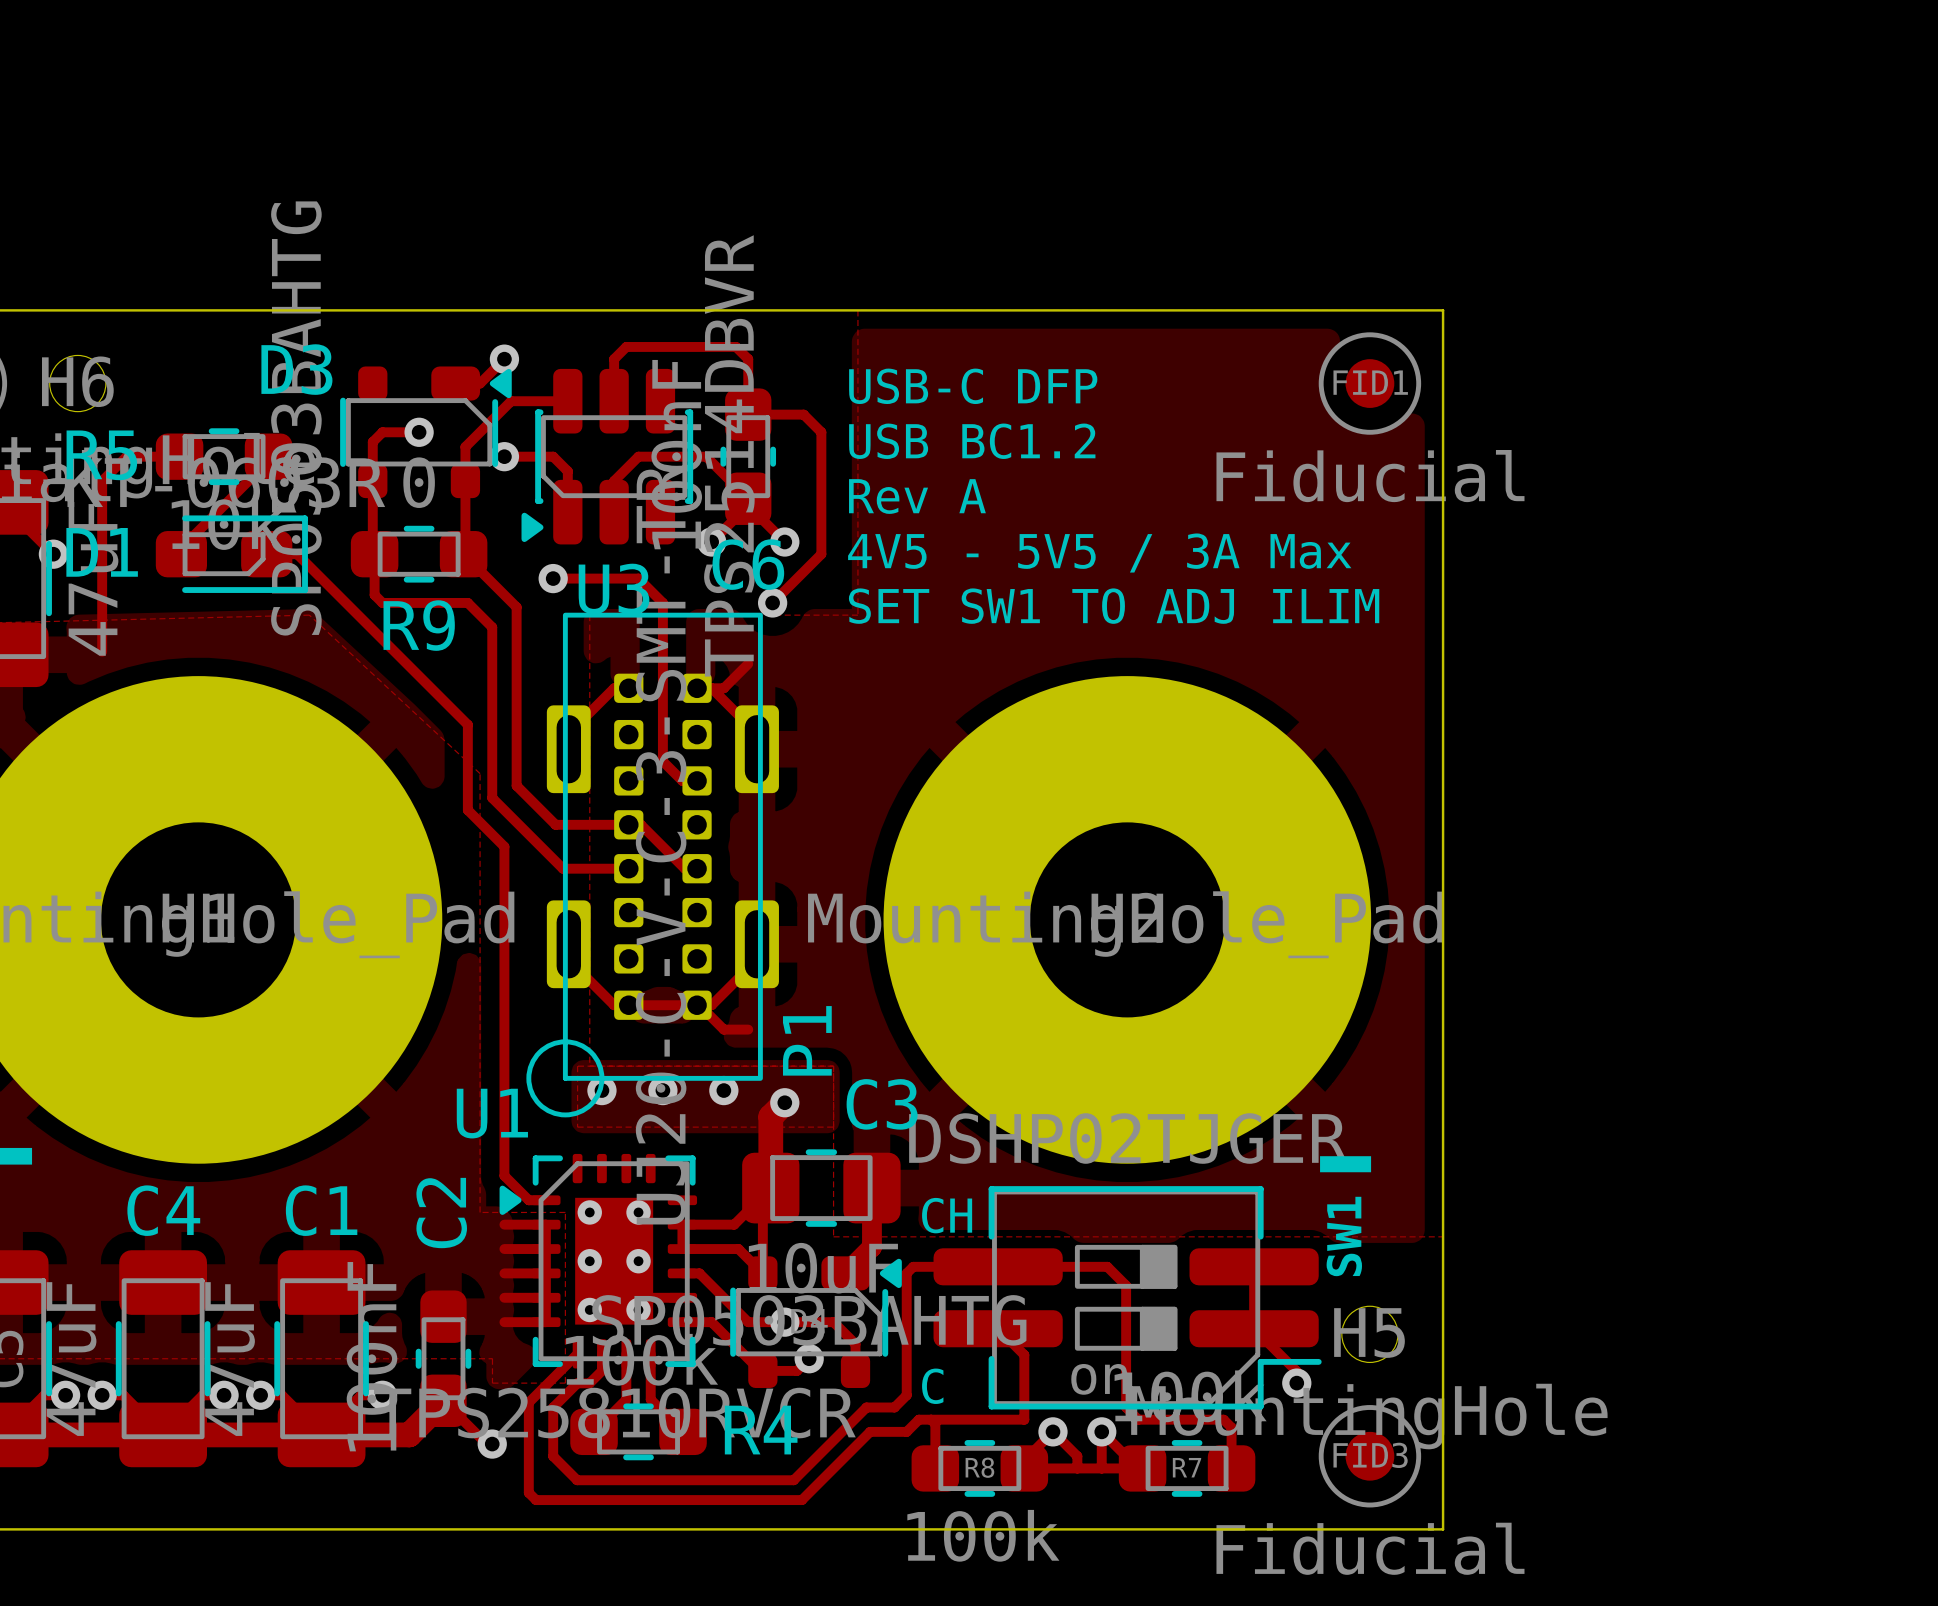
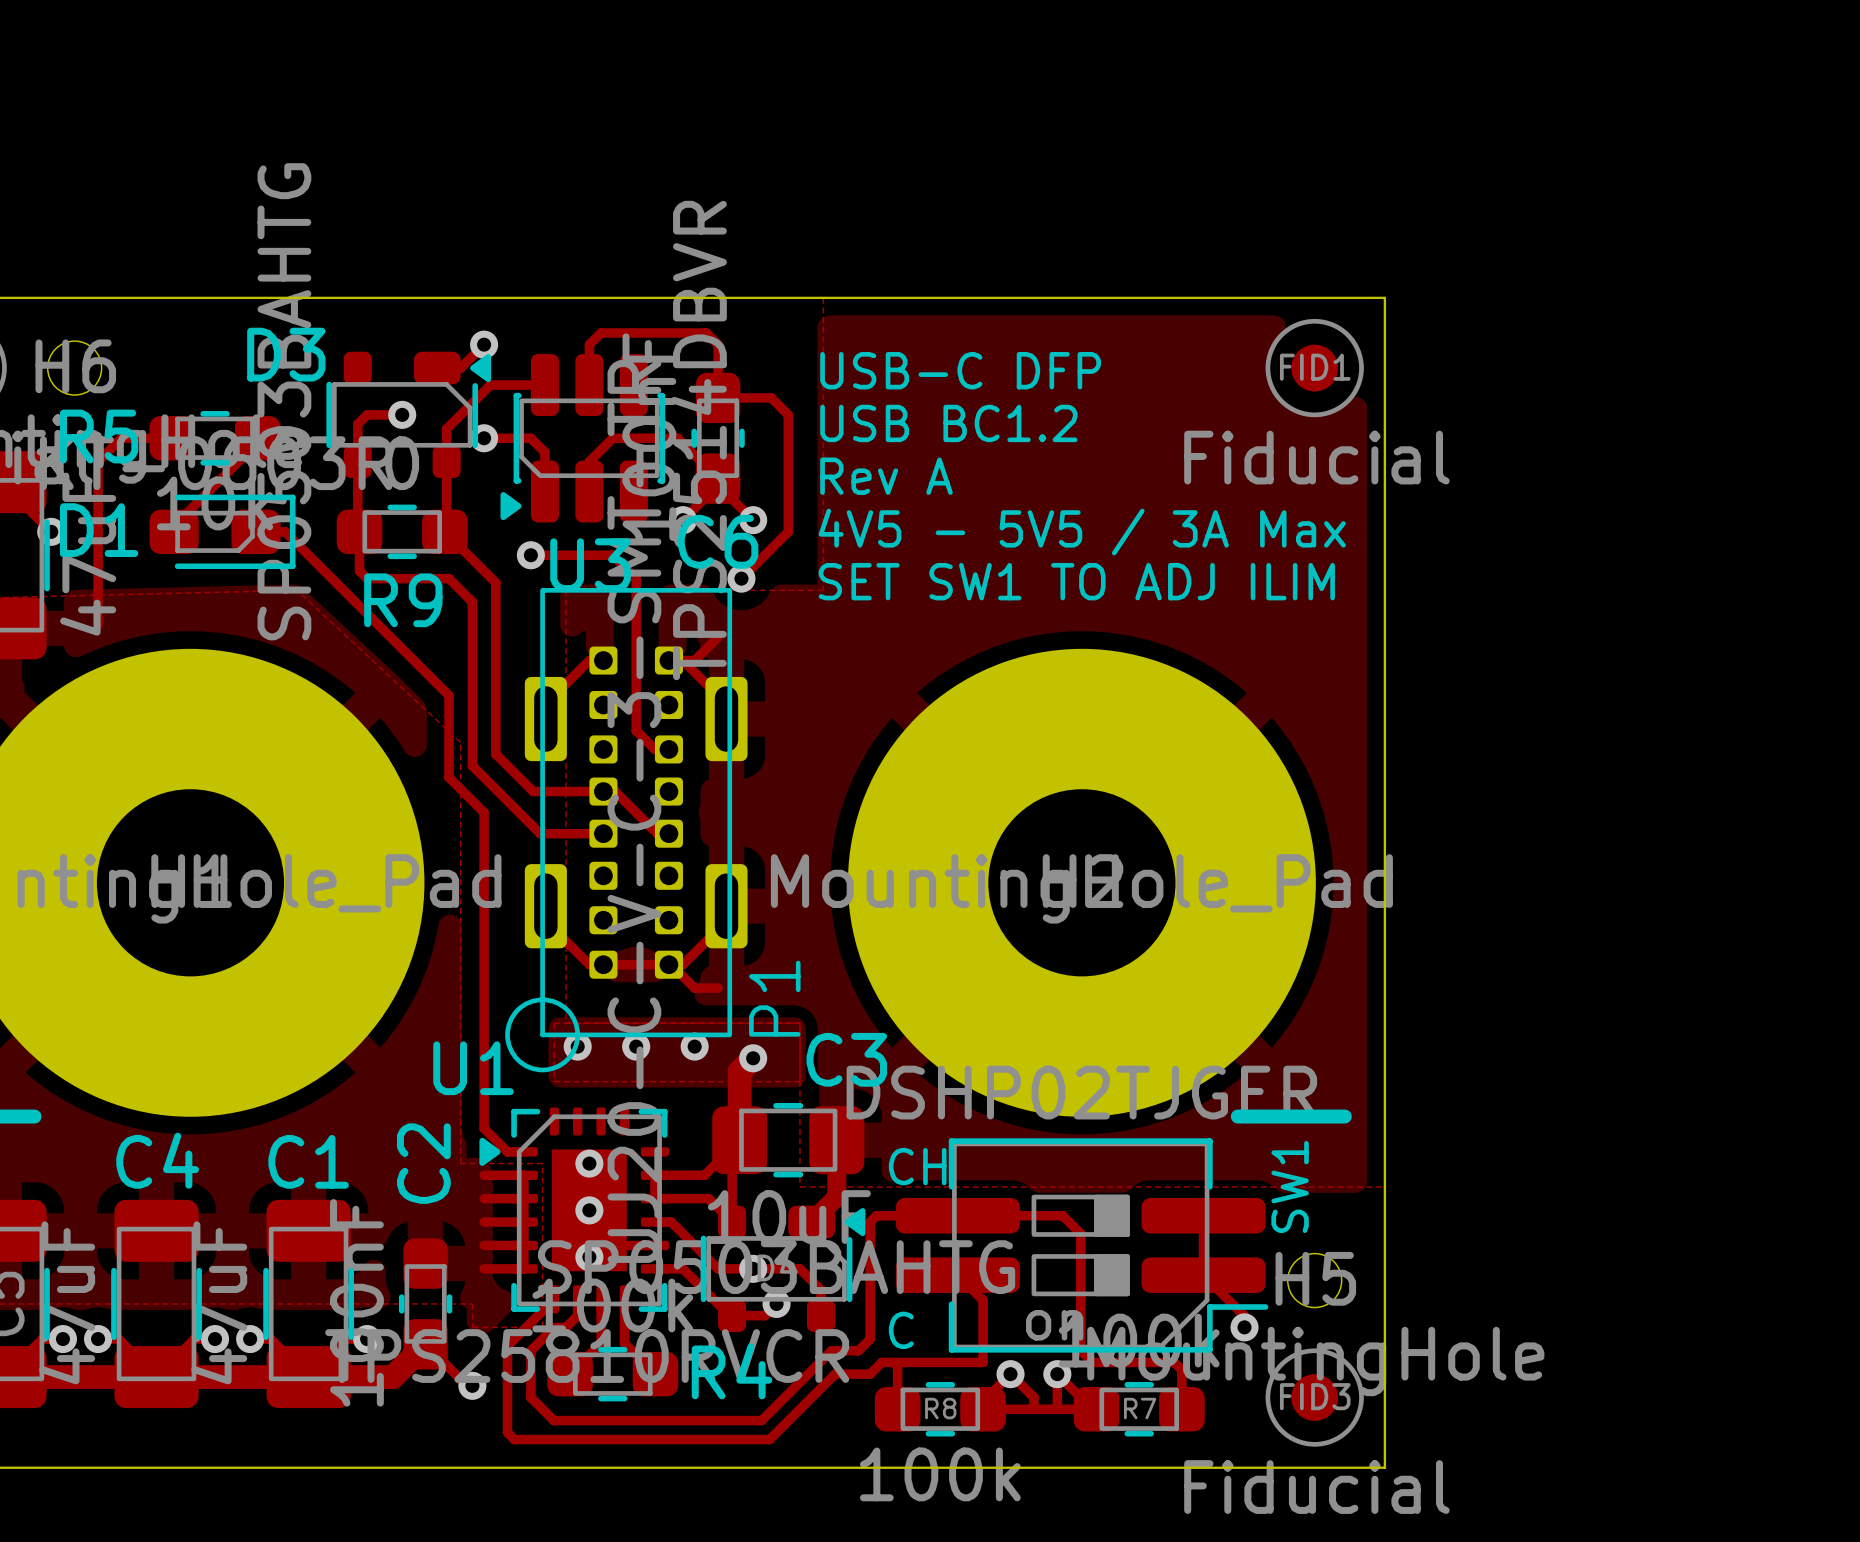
via: (589, 1212) -> none
via: none -> (589, 1163)
via: (638, 1212) -> none
via: (589, 1261) -> none
via: none -> (589, 1210)
via: (638, 1261) -> none
via: (589, 1309) -> none
via: none -> (589, 1257)
via: (638, 1309) -> none

